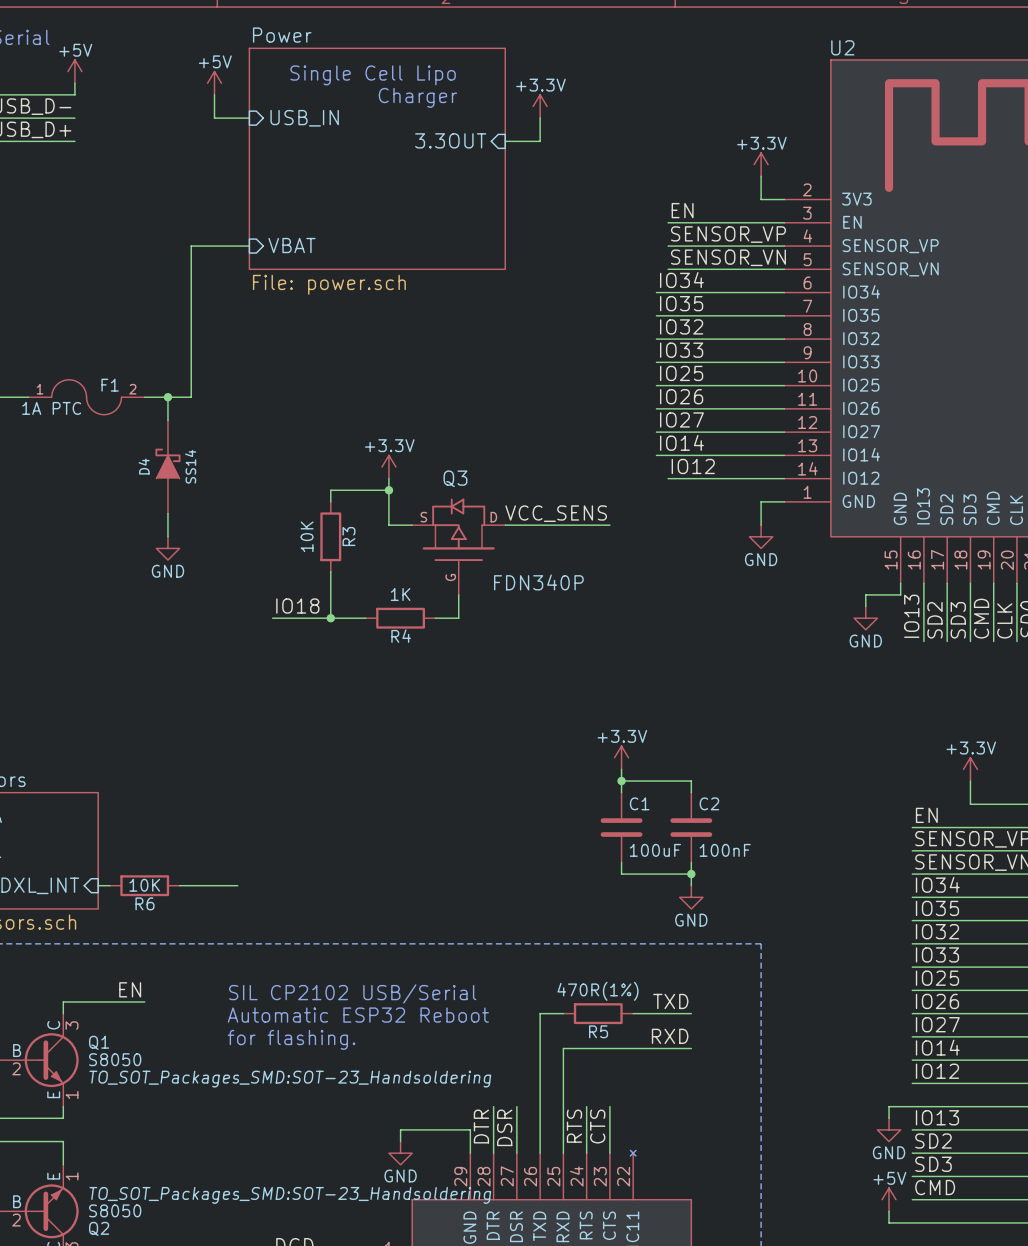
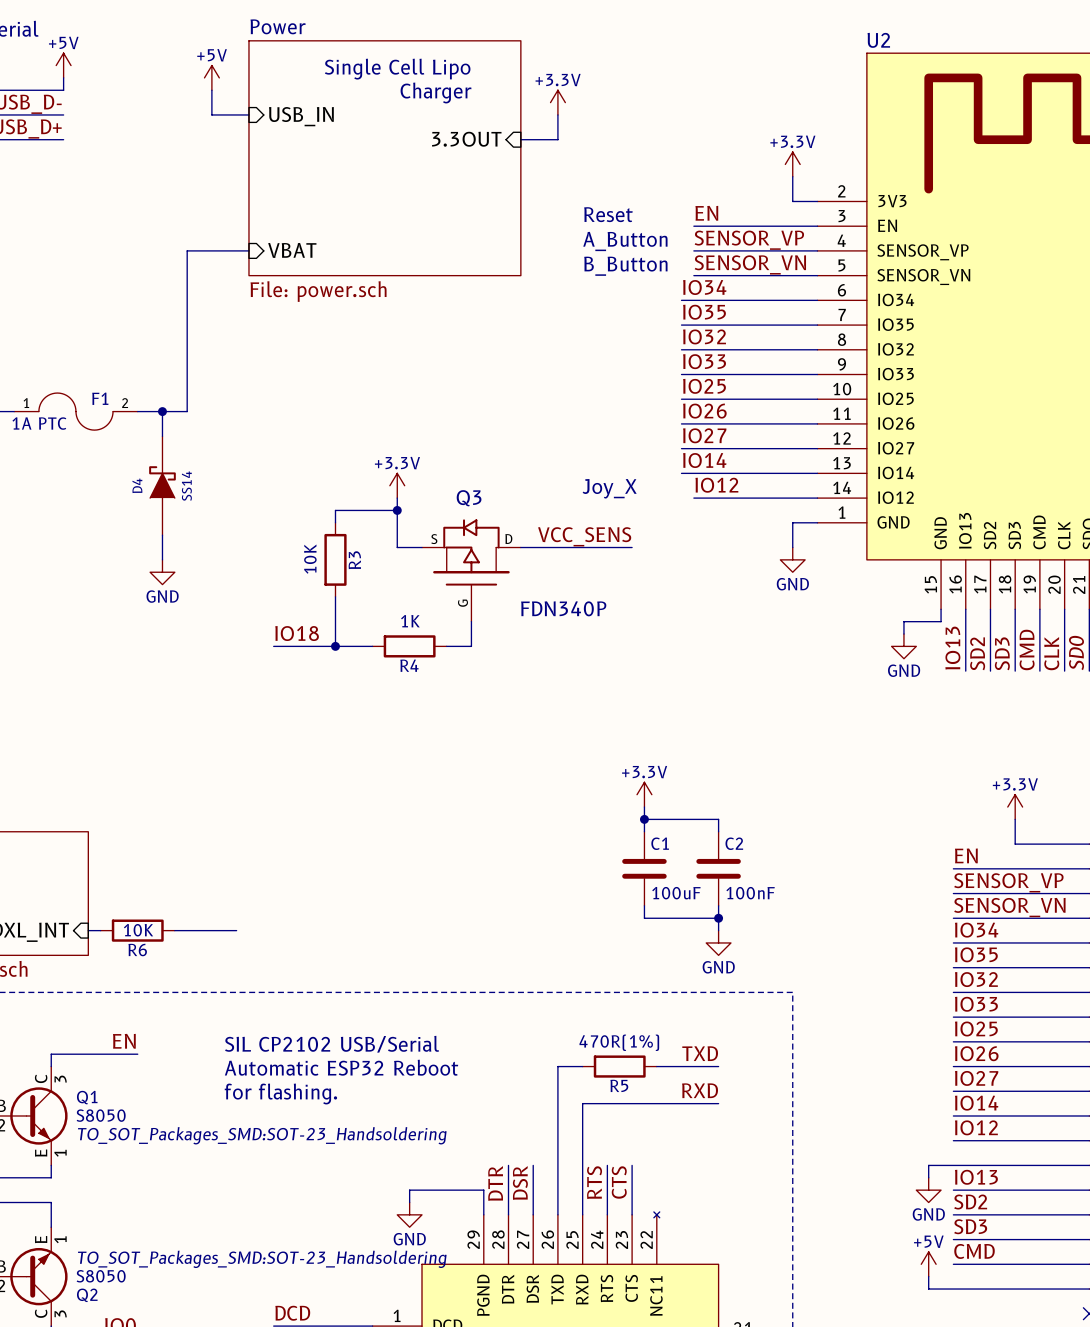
text: none -> Reset (608, 214)
text: none -> A_Button (625, 241)
text: none -> B_Button (625, 266)
text: none -> Joy_X (609, 488)

